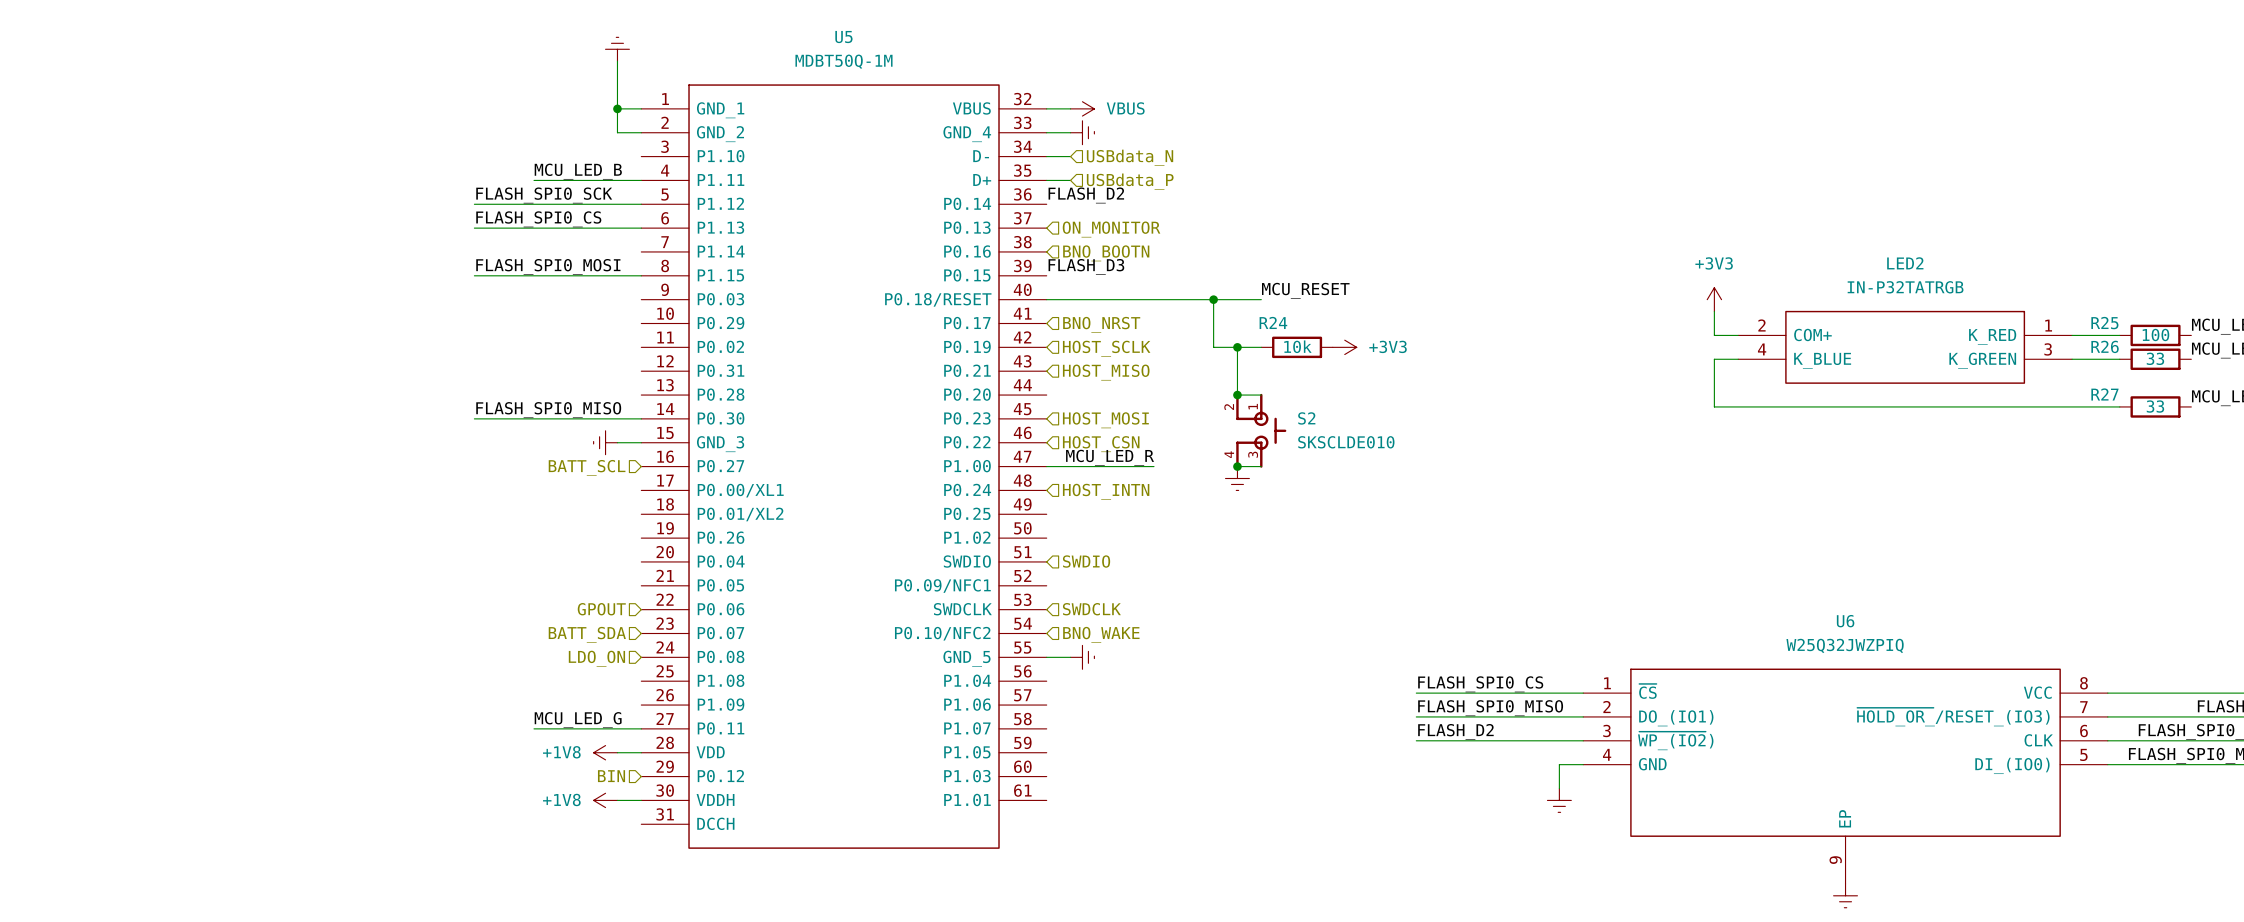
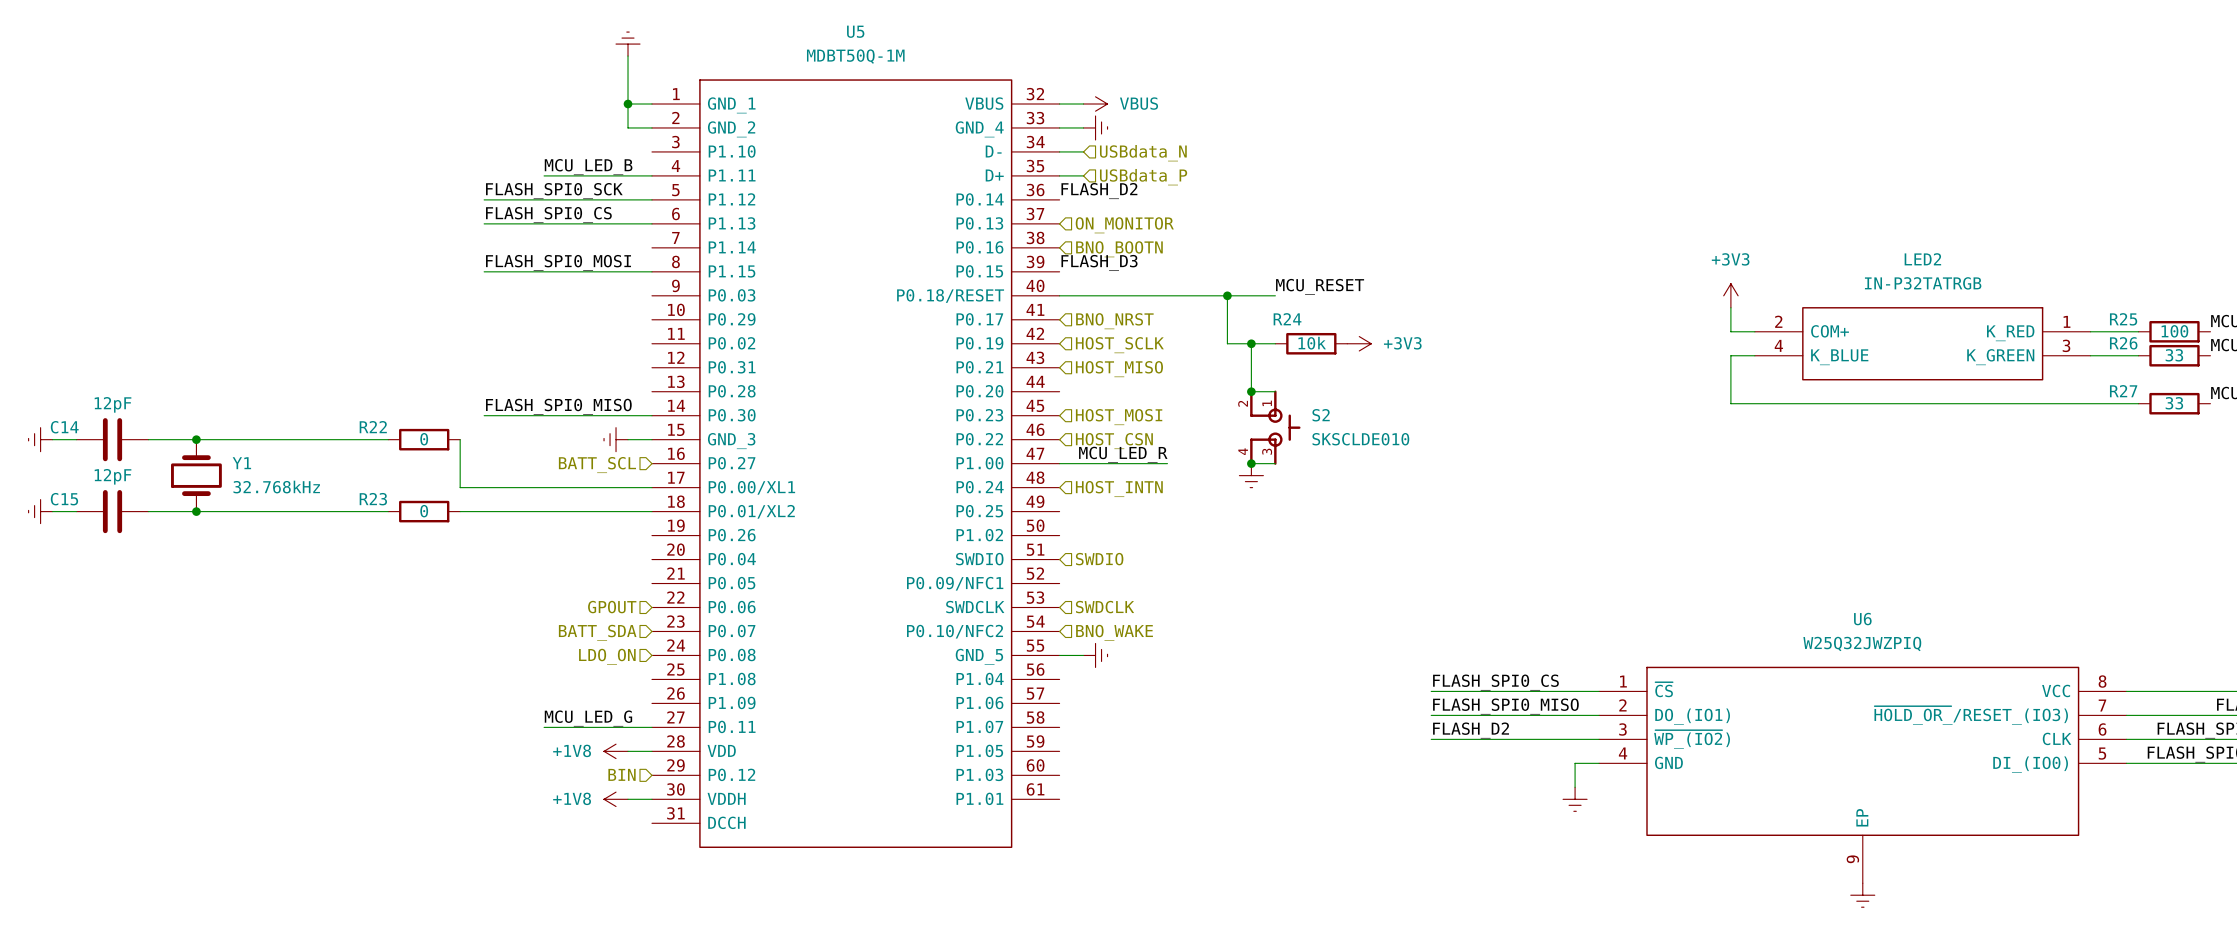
power symbol: none -> (40, 439)
wire: none -> (52, 439) (76, 439)
C14: none -> 12pF (112, 439)
wire: none -> (148, 439) (388, 439)
junction: none -> (196, 439)
R22: none -> 0 (424, 439)
wire: none -> (460, 439) (460, 487) (651, 487)
Y1: none -> 32.768kHz (196, 475)
power symbol: none -> (40, 511)
wire: none -> (52, 511) (76, 511)
C15: none -> 12pF (112, 511)
wire: none -> (148, 511) (388, 511)
junction: none -> (196, 511)
R23: none -> 0 (424, 511)
wire: none -> (460, 511) (651, 511)

